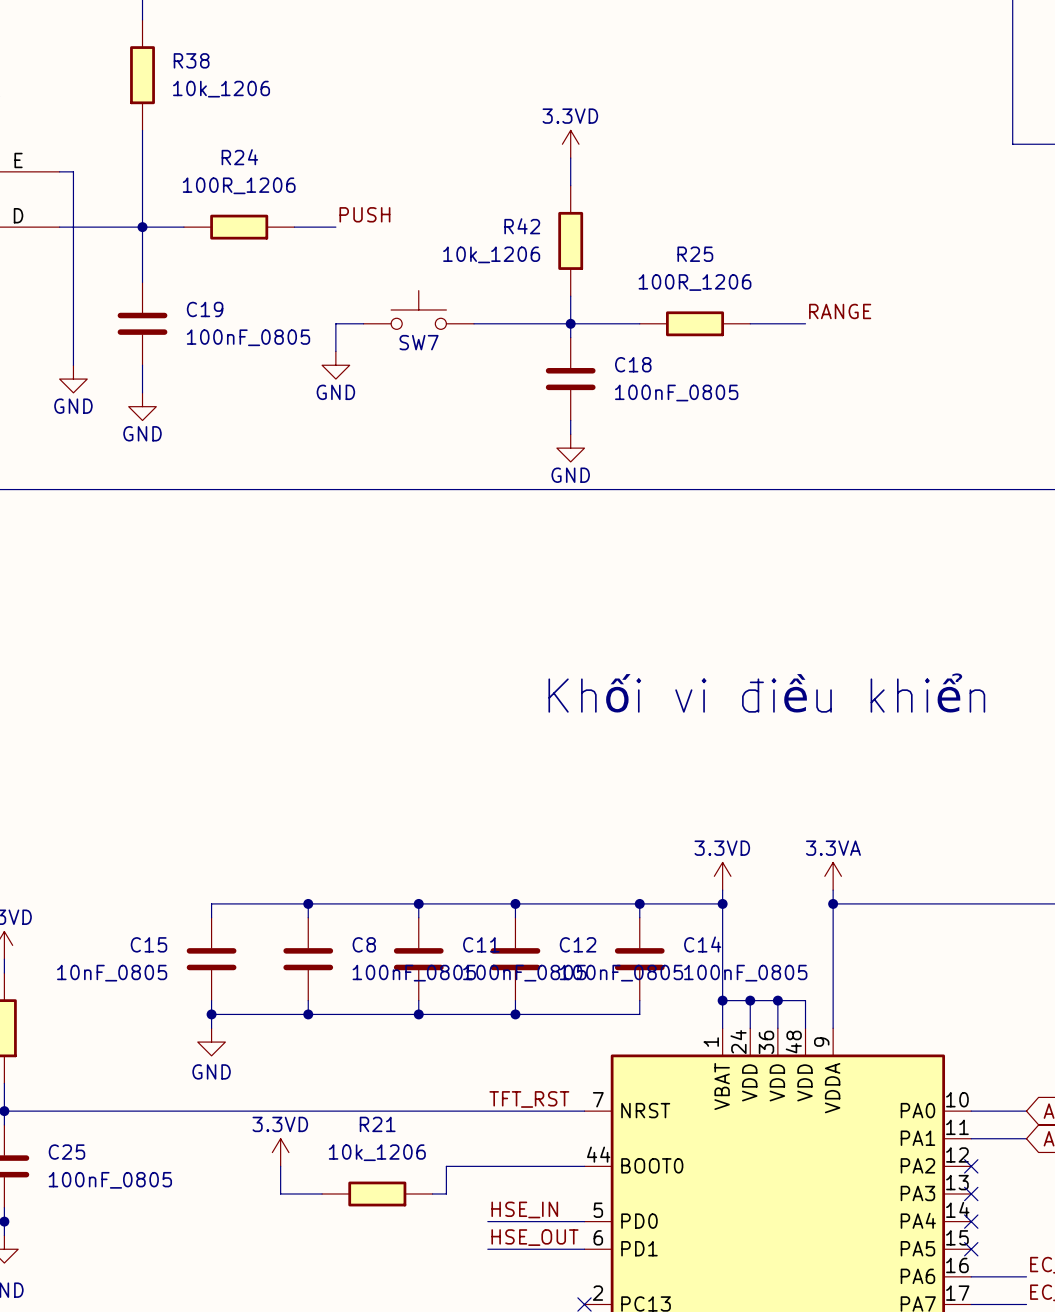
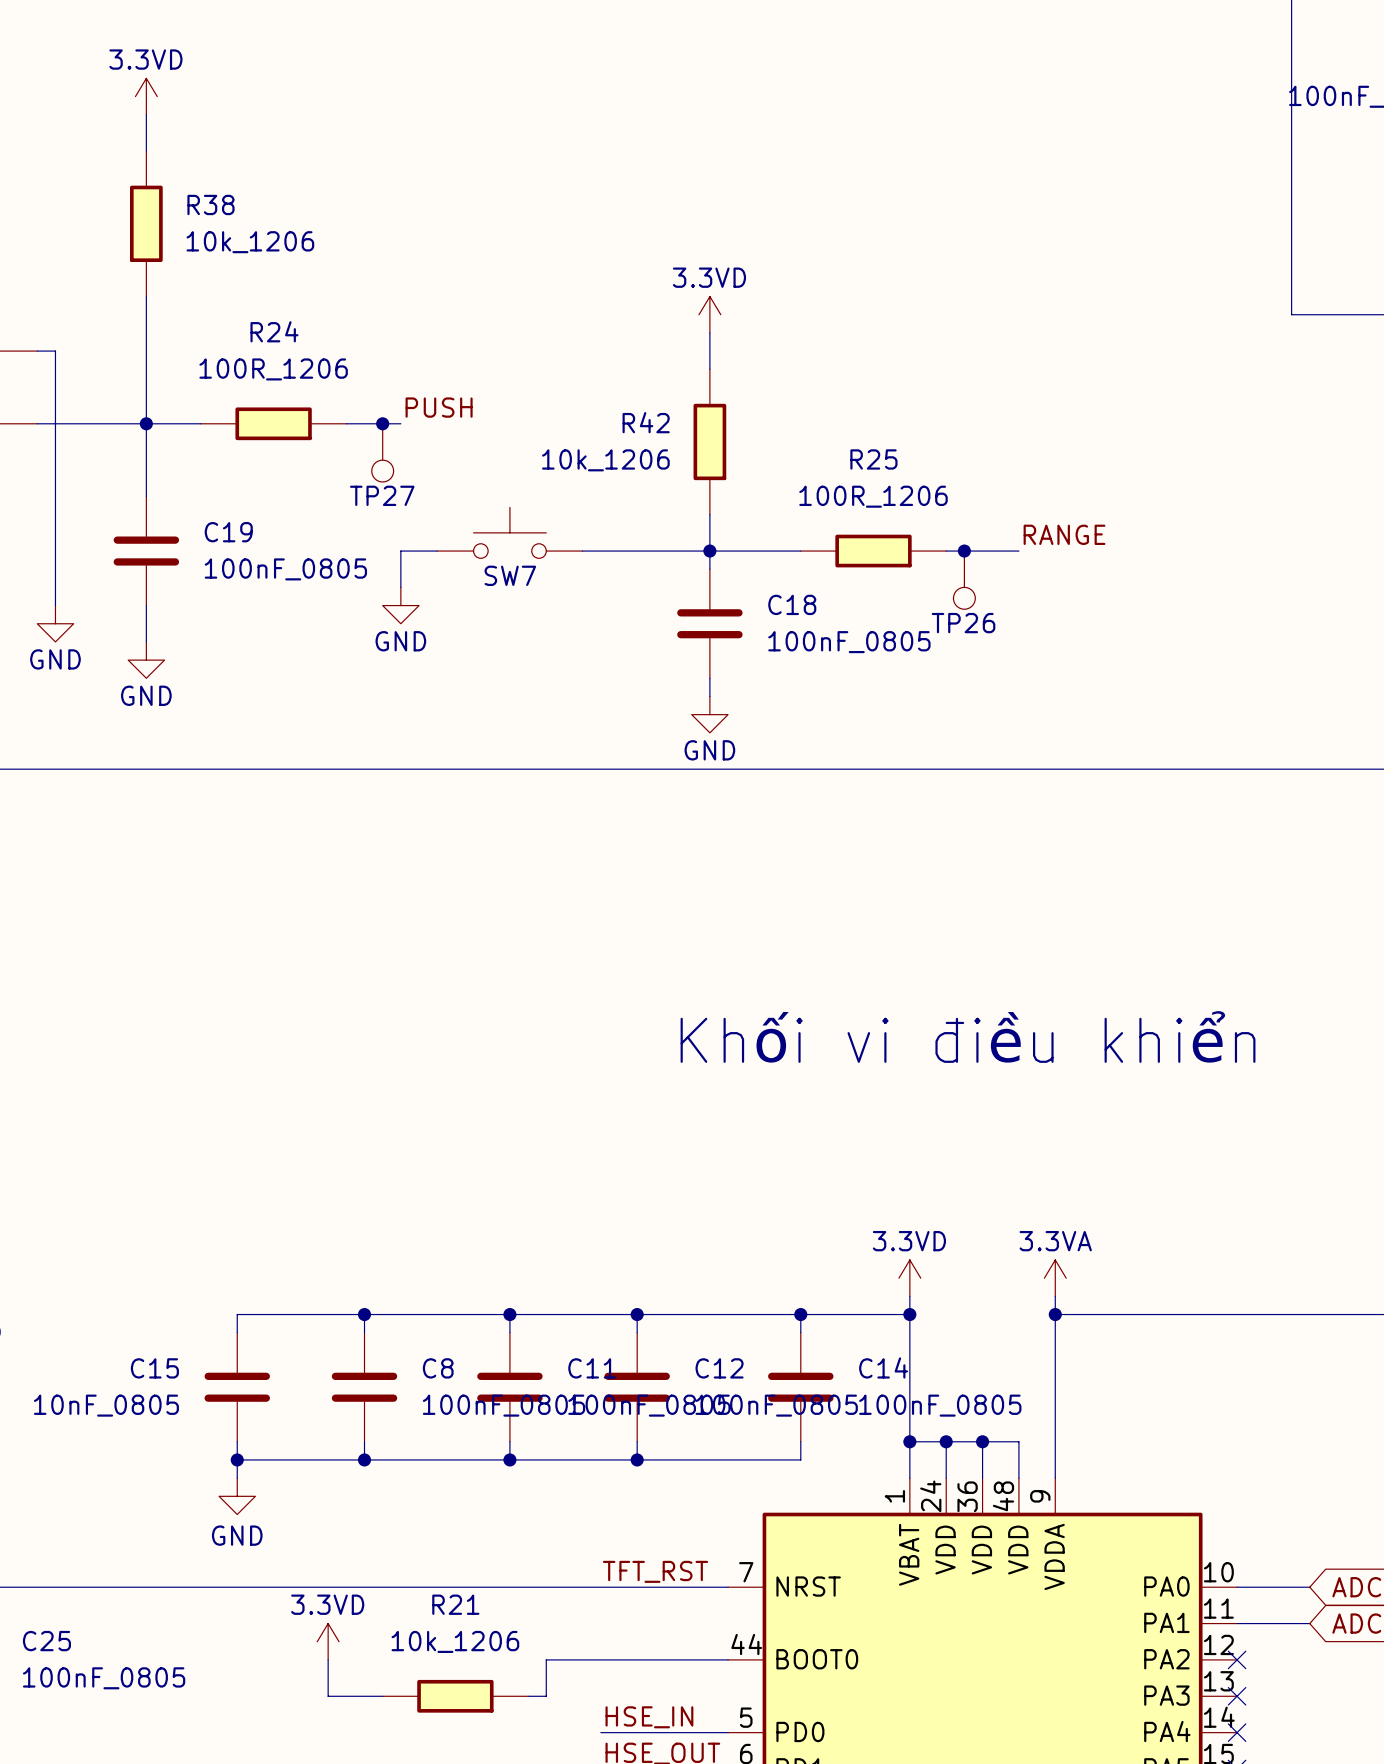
junction: none -> (382, 423)
TP27: none -> (382, 452)
junction: none -> (964, 551)
TP26: none -> (964, 580)

